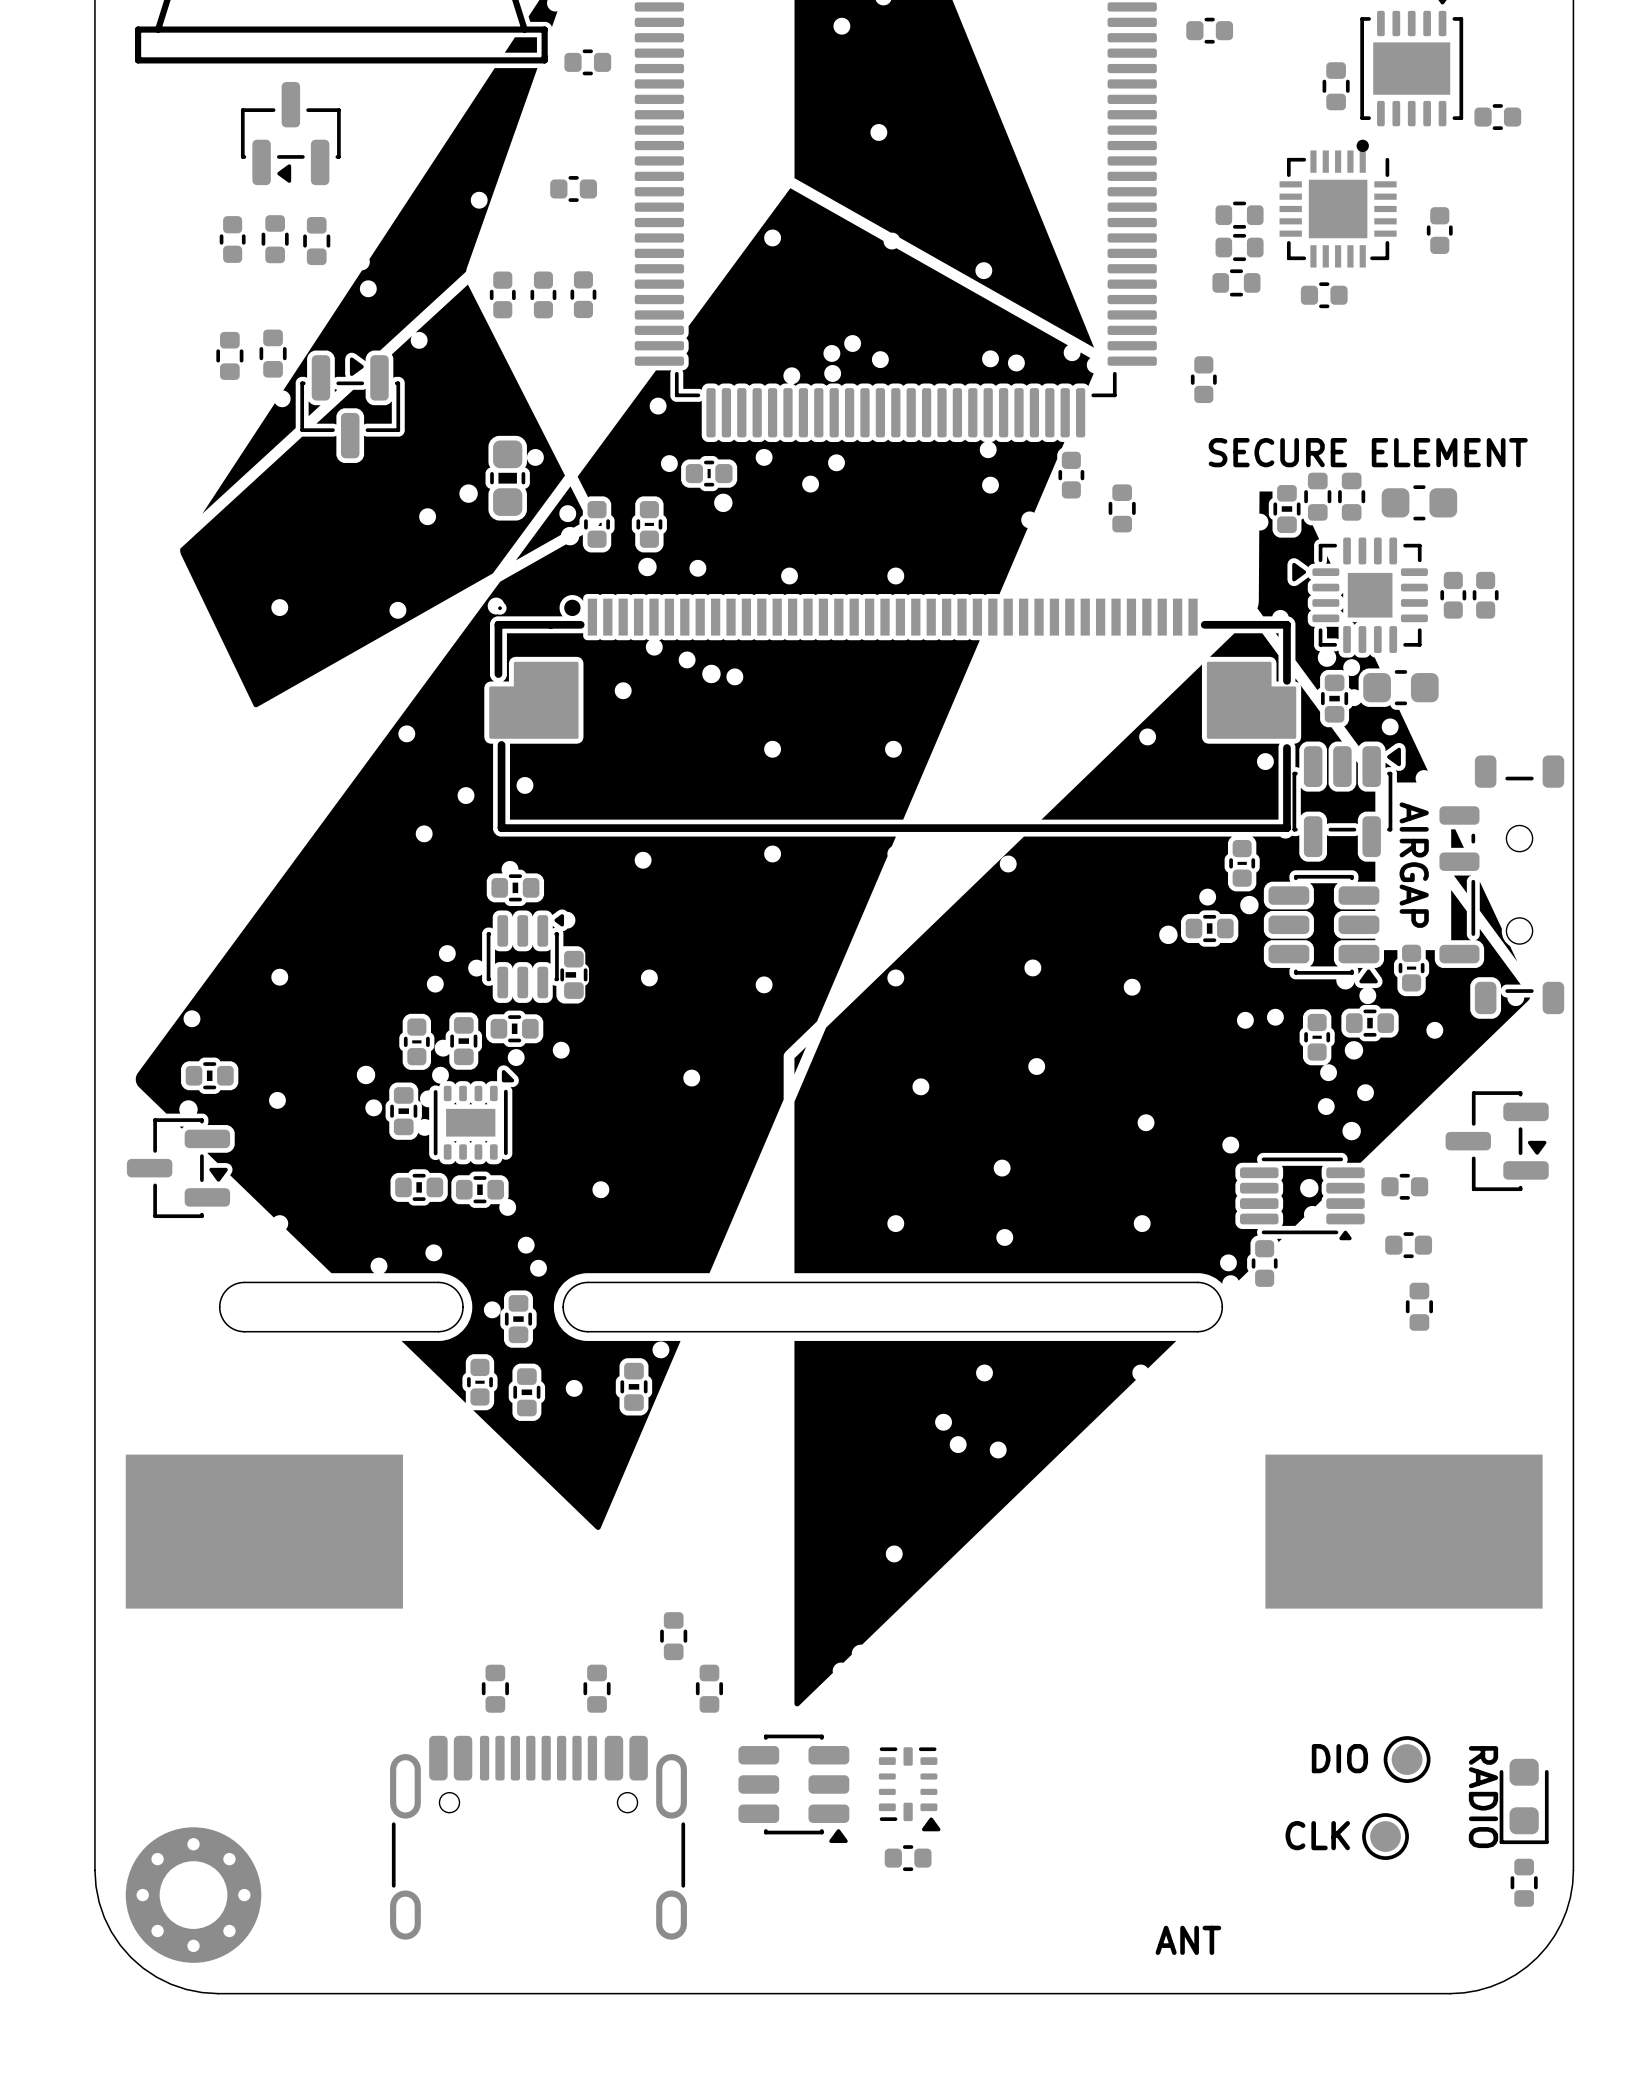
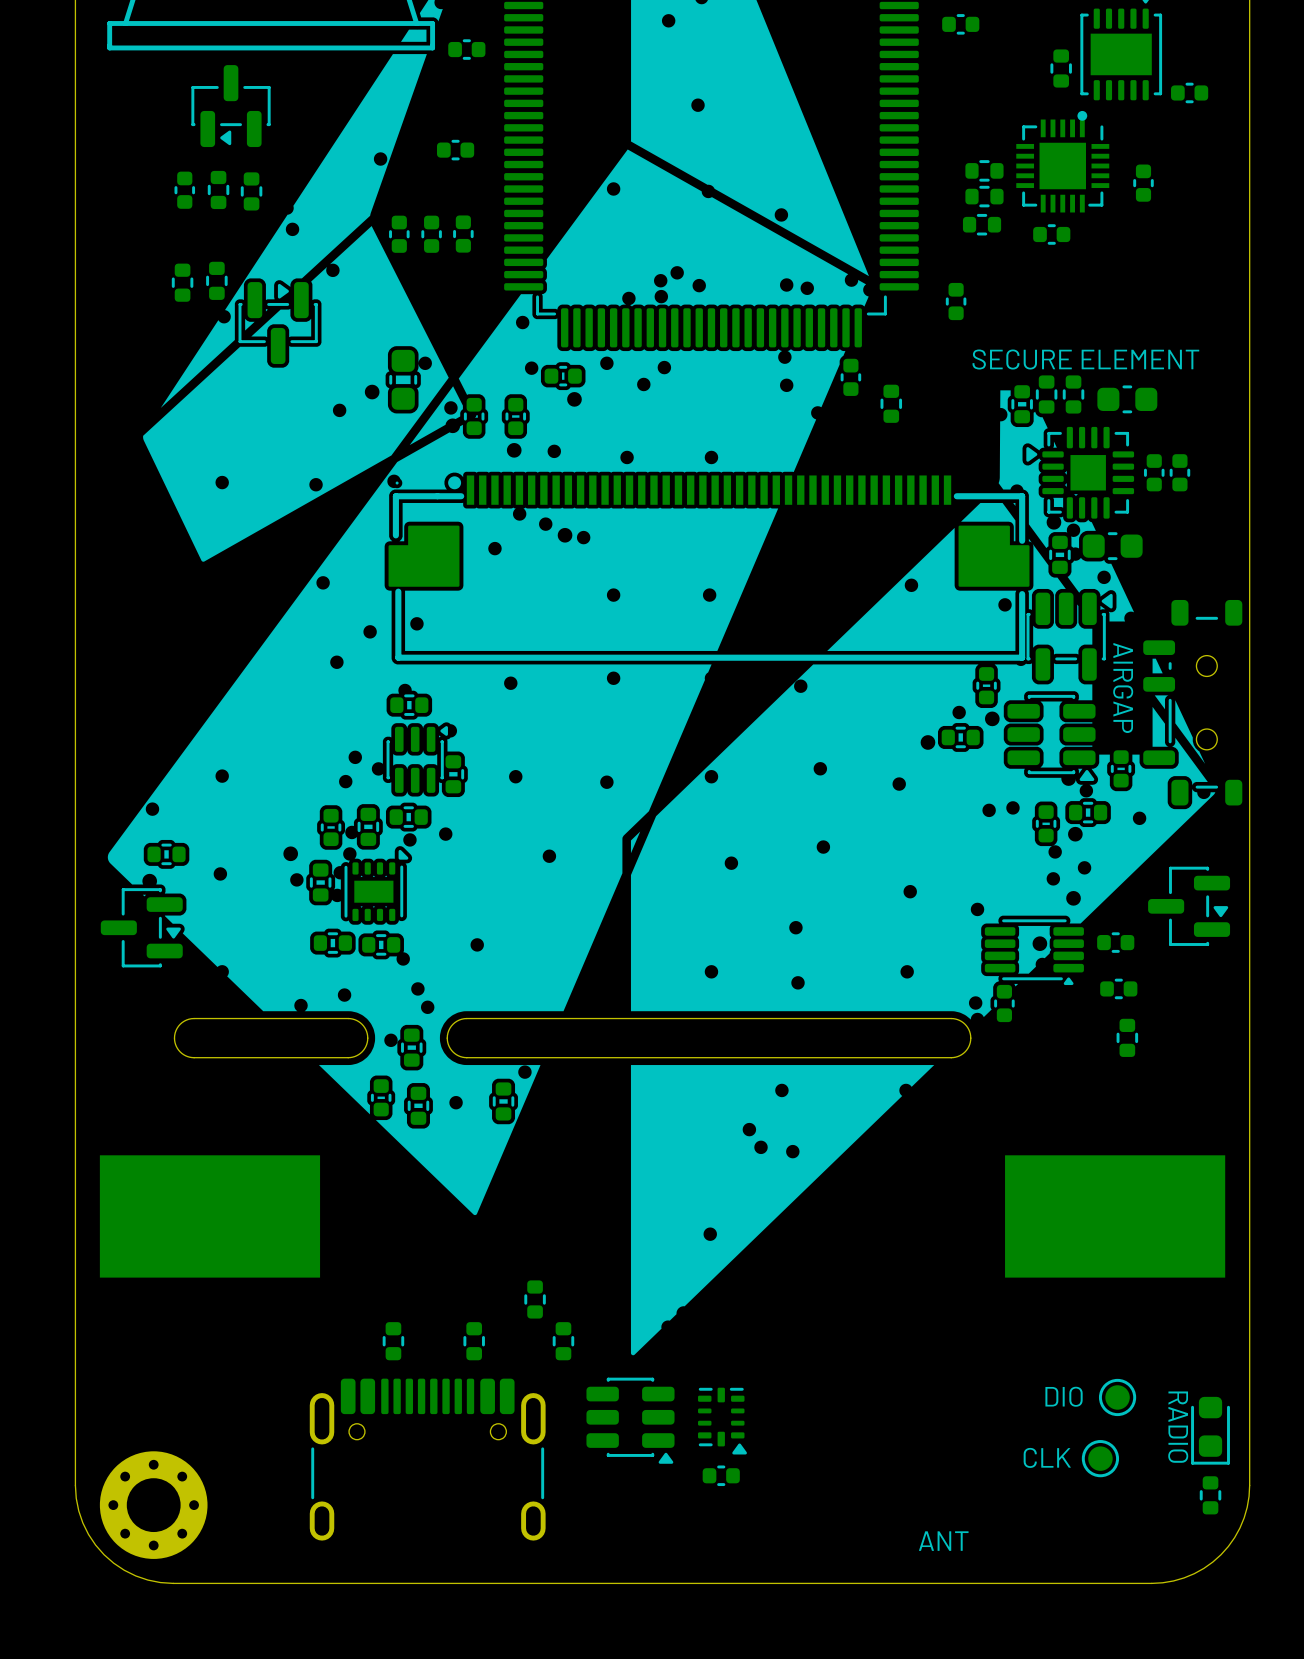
part footprint: [560, 950, 588, 999] -> [445, 755, 465, 794]

